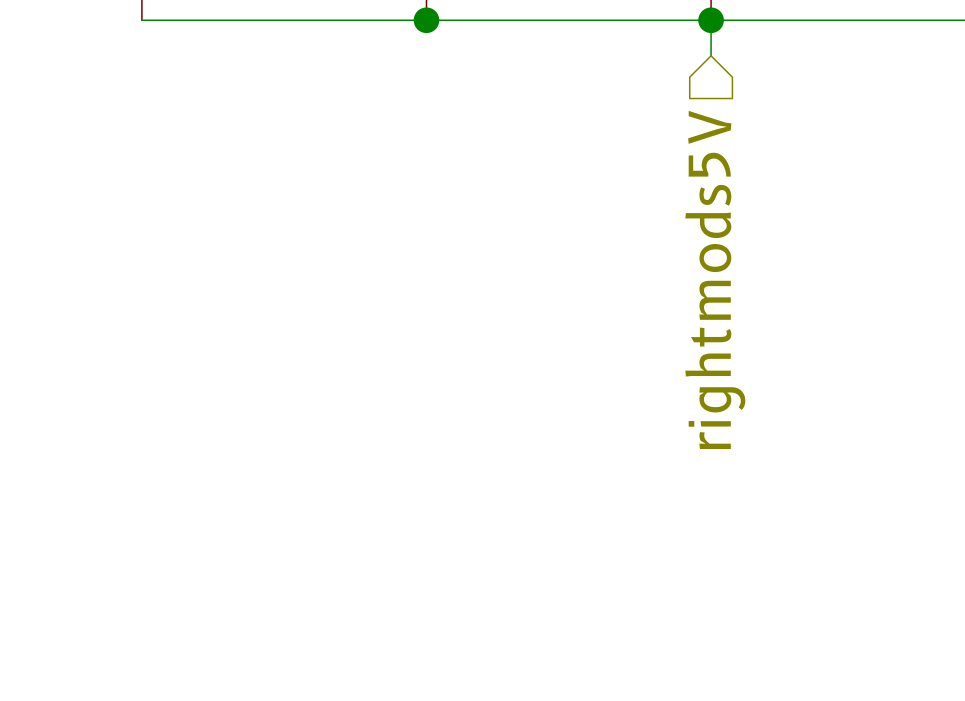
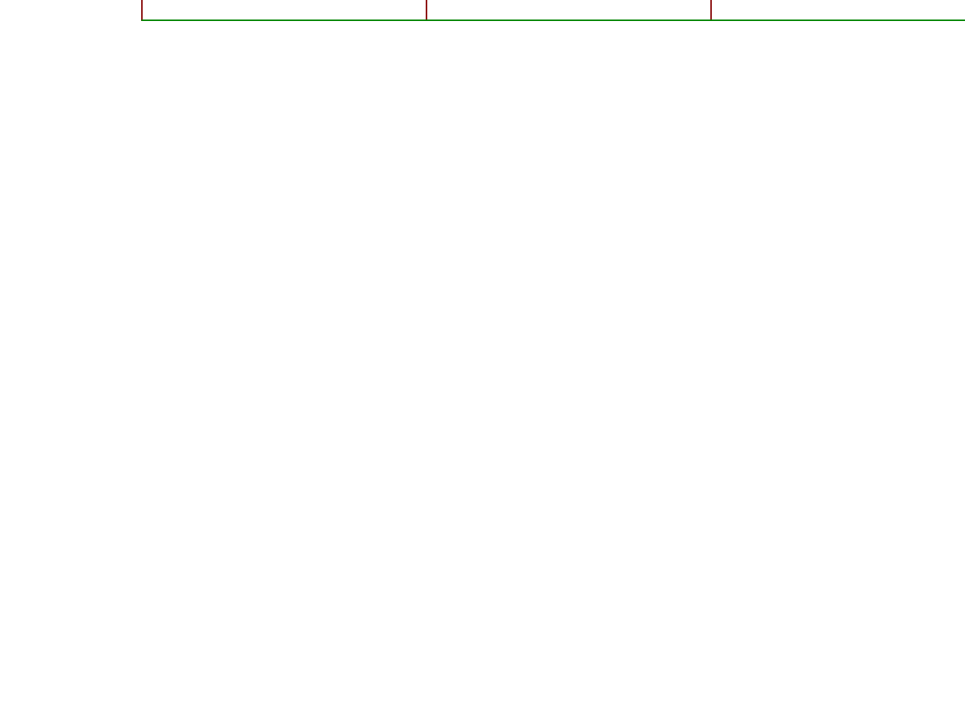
junction: (426, 20) -> none
wire: (711, 20) (711, 55) -> none
junction: (711, 20) -> none
hierarchical label: rightmods5V (715, 279) -> none

